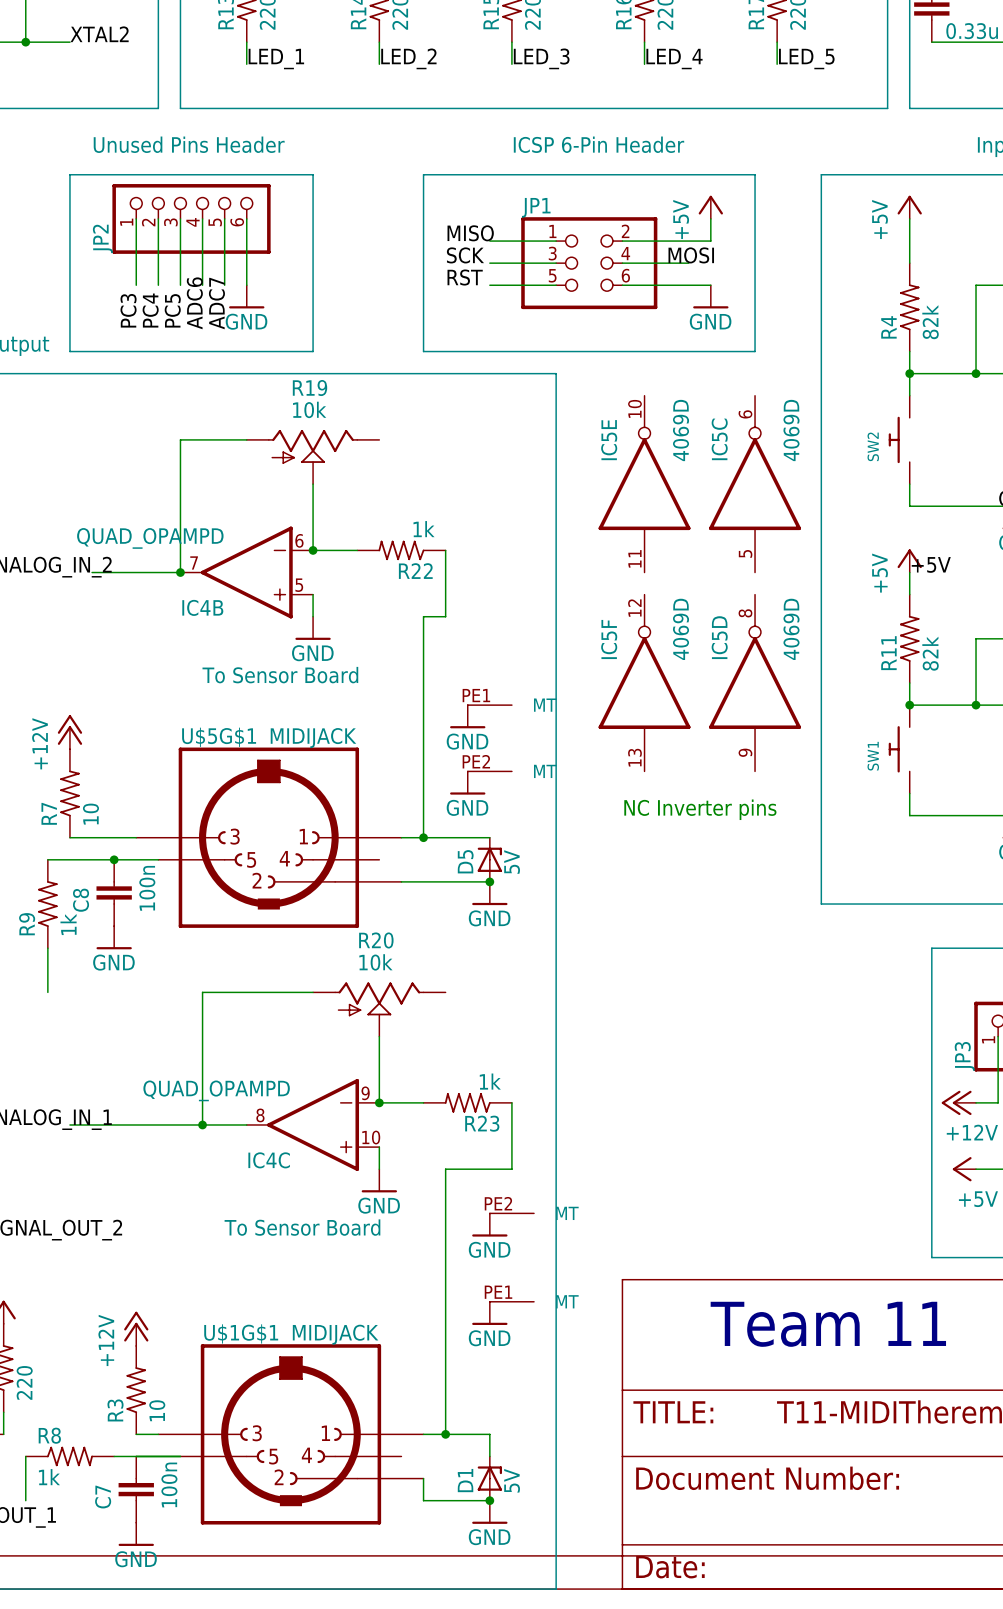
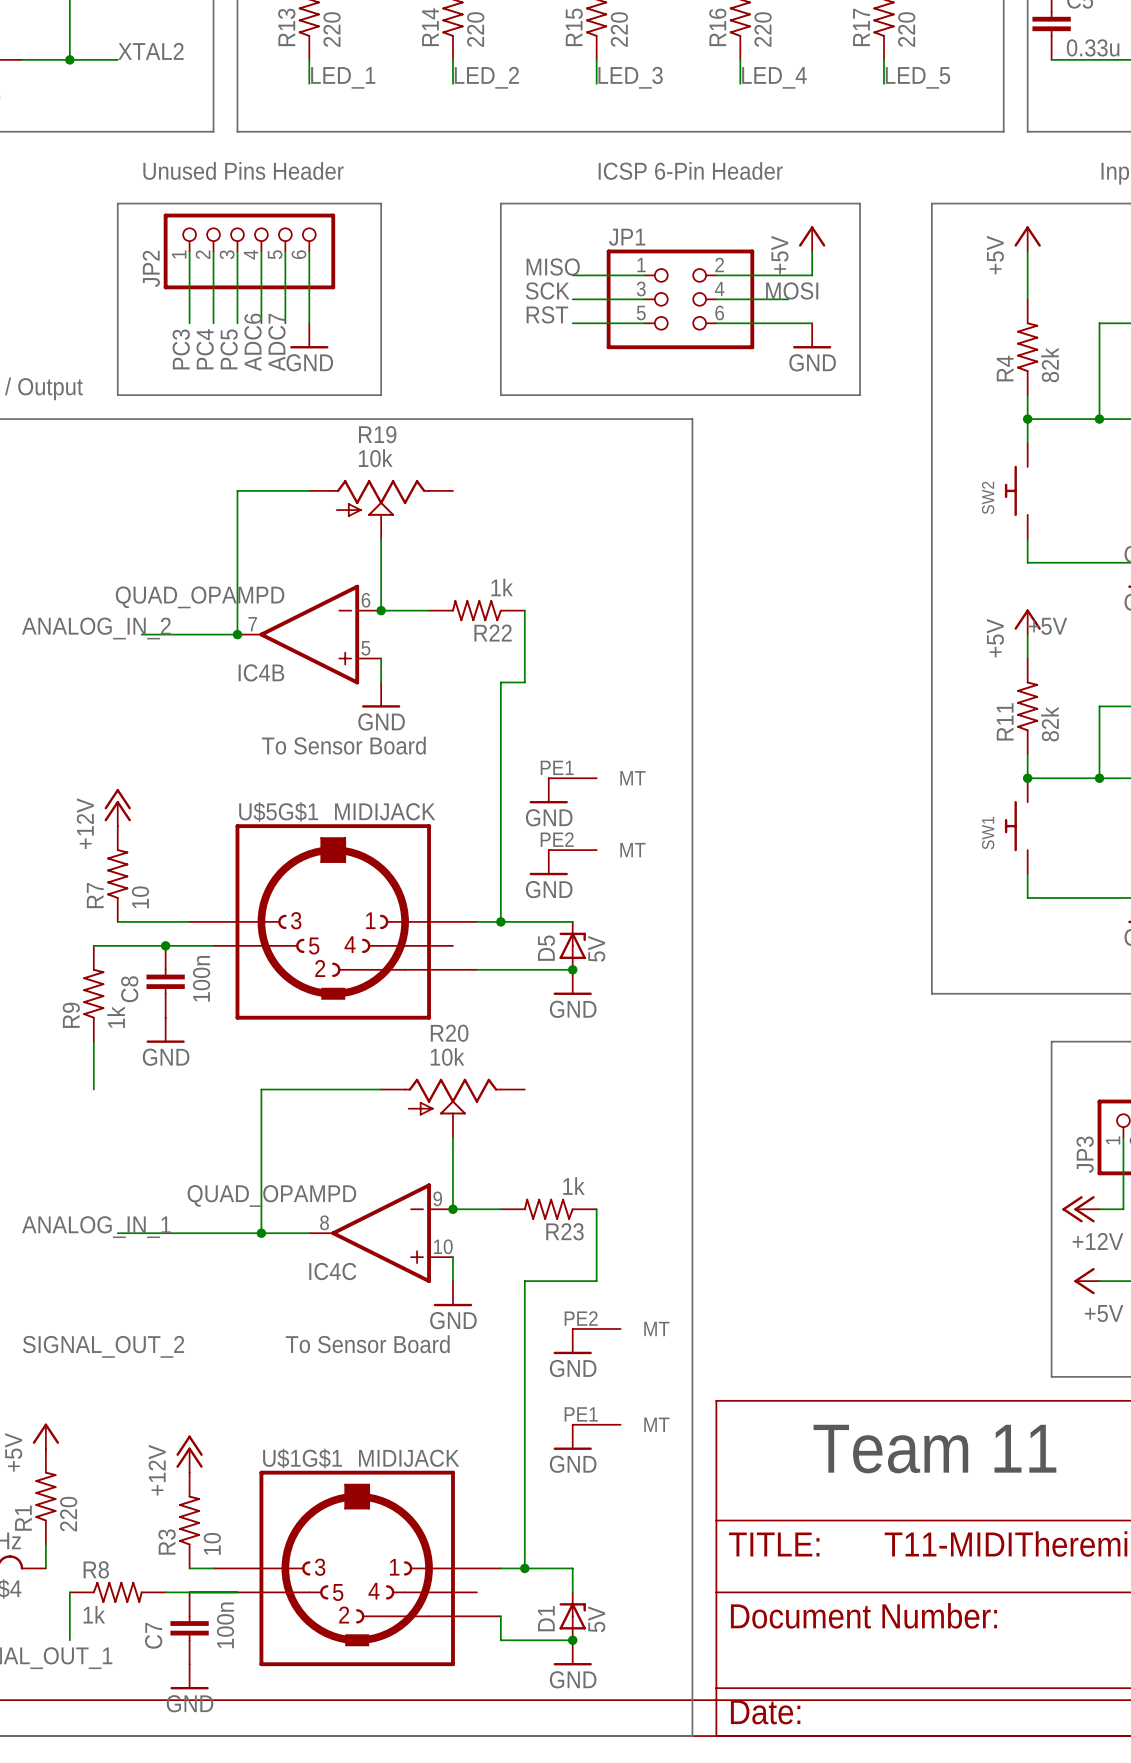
line: (556, 373) (556, 1589) -> (644, 419) (692, 419) (692, 1736) (644, 1736)
IC5E: 4069D (644, 484) -> none
IC5C: 4069D (755, 484) -> none
IC5F: 4069D (644, 683) -> none
IC5D: 4069D (755, 683) -> none
text: NC Inverter pins (700, 809) -> none

